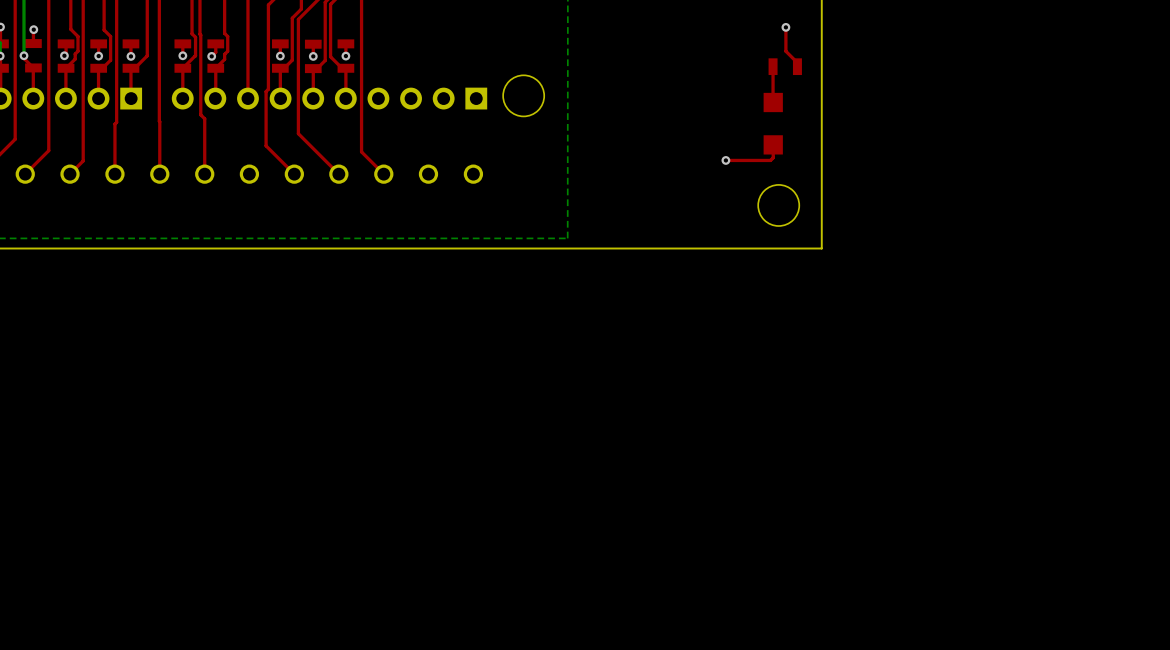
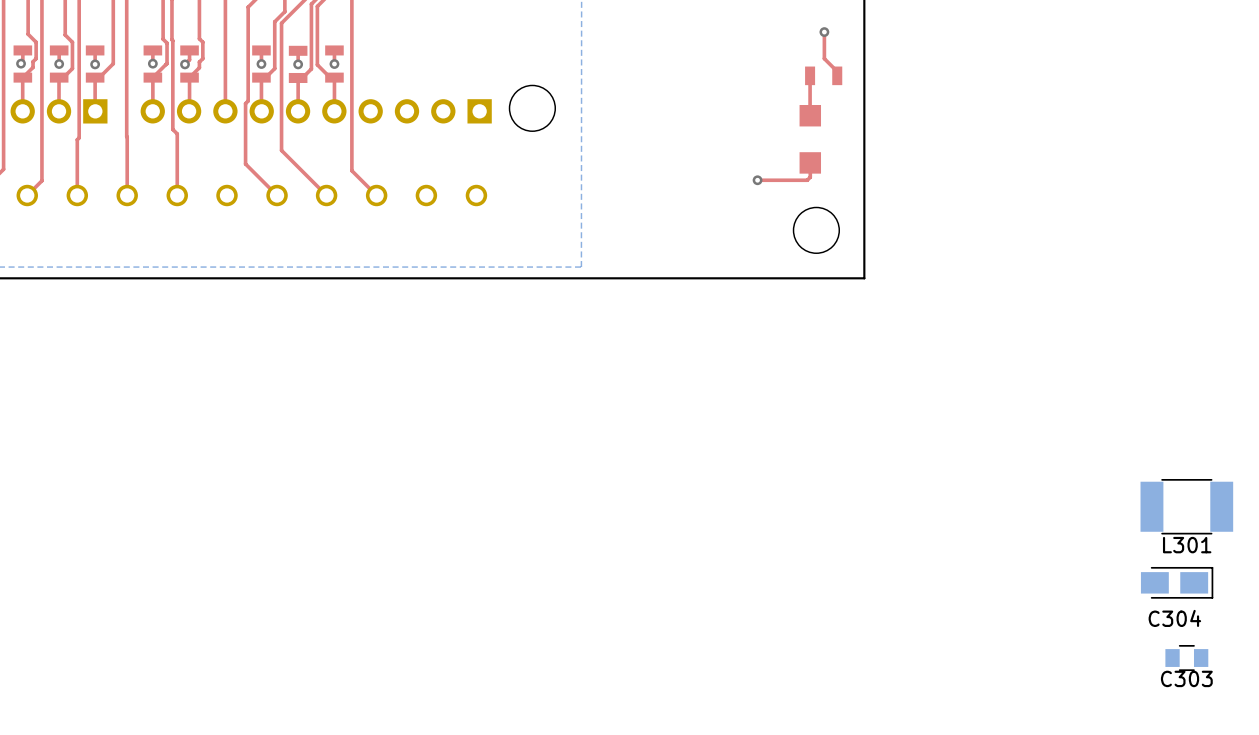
L301: none -> (1186, 506)
C304: none -> (1177, 582)
C303: none -> (1186, 658)

